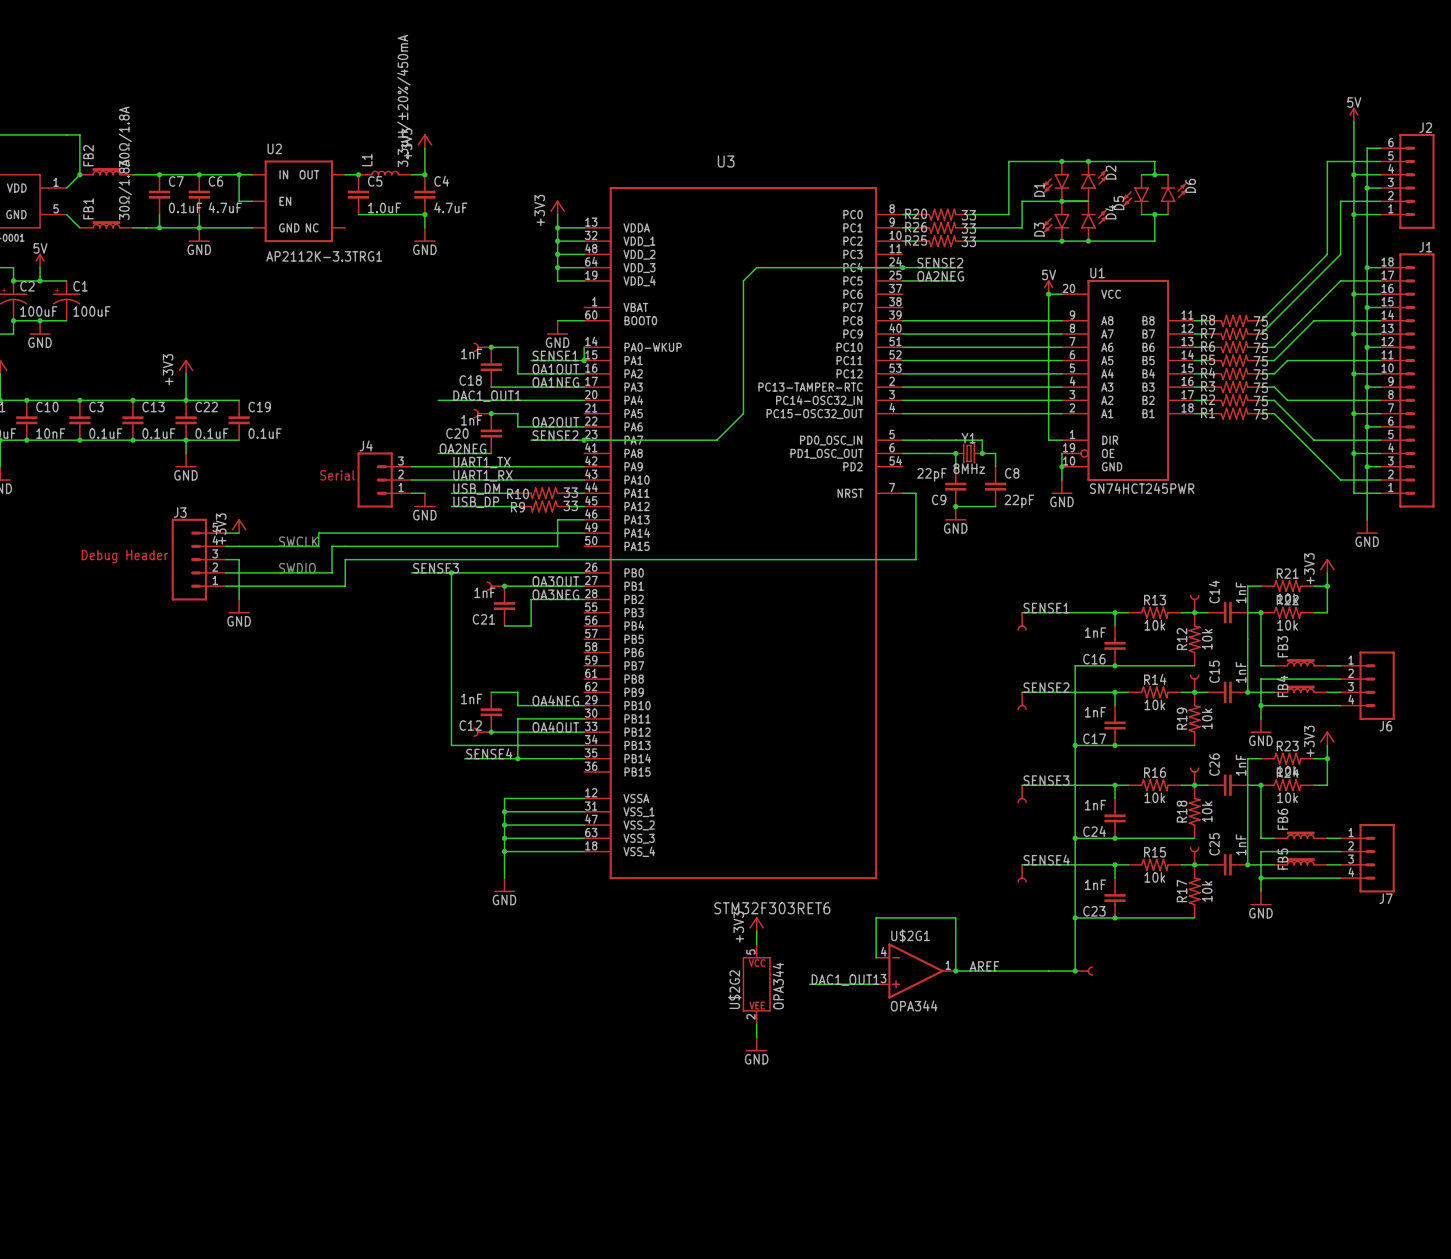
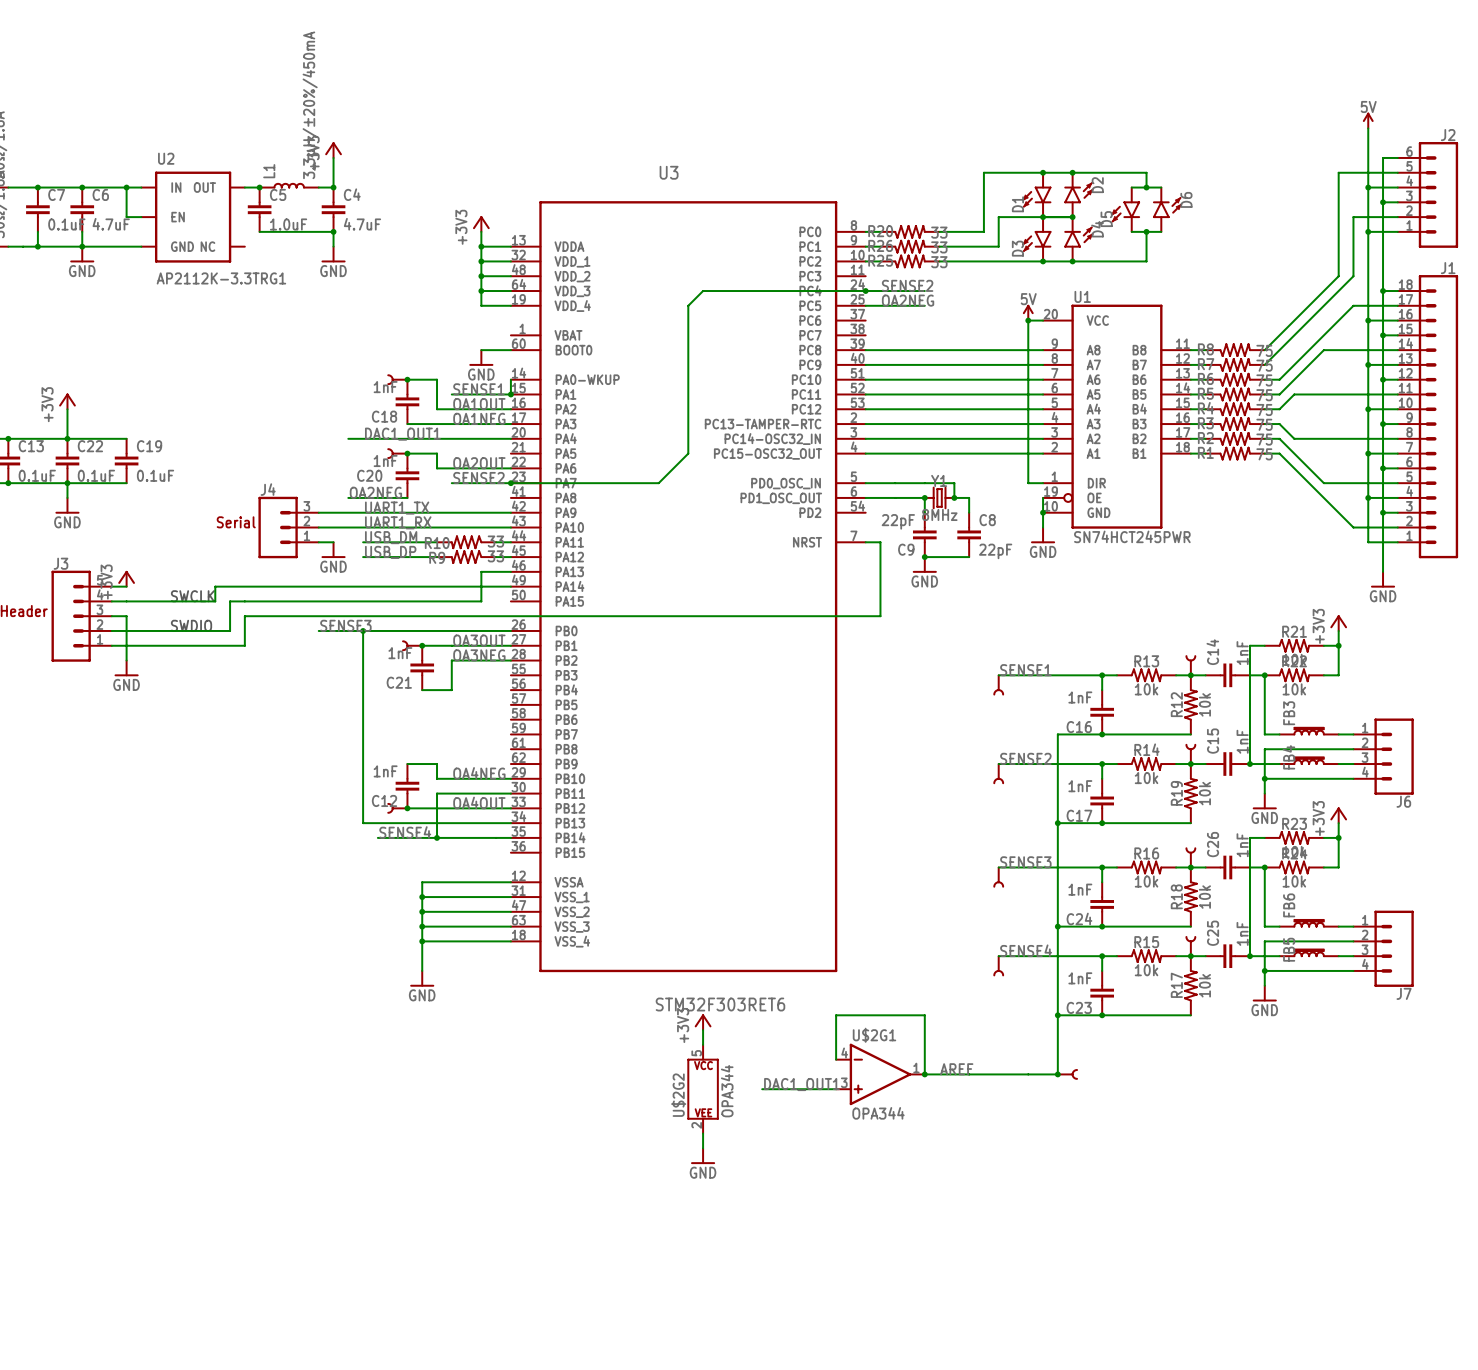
junction: none -> (1072, 217)

